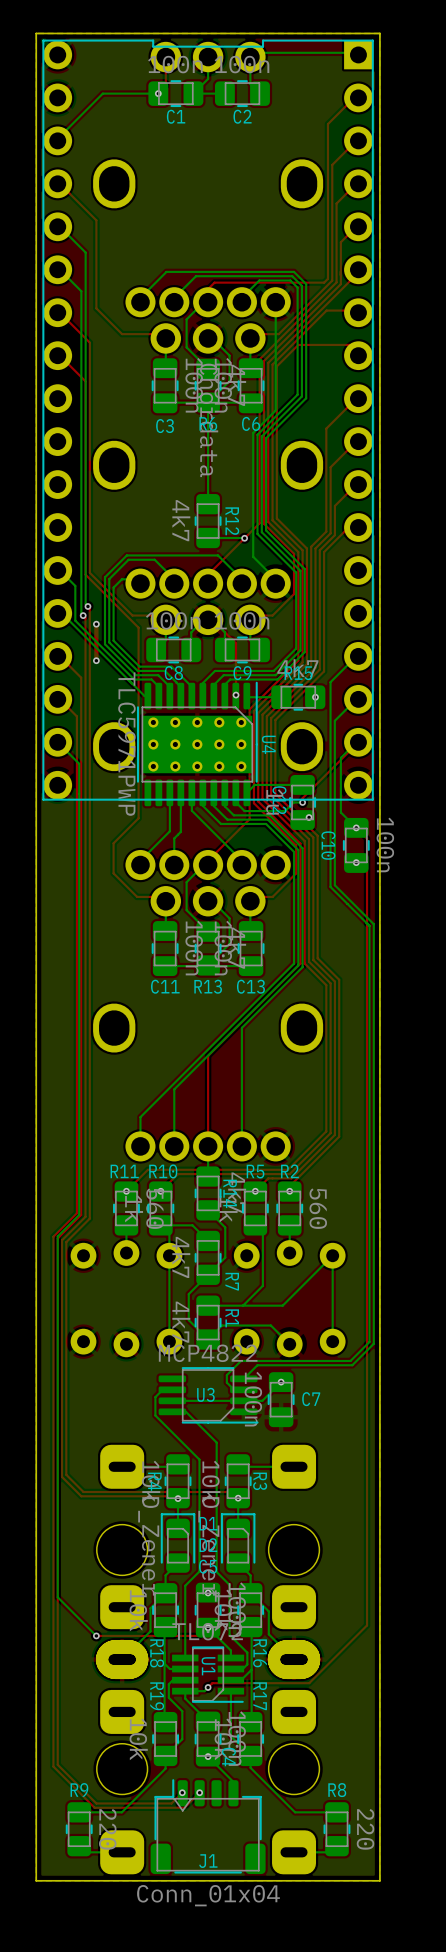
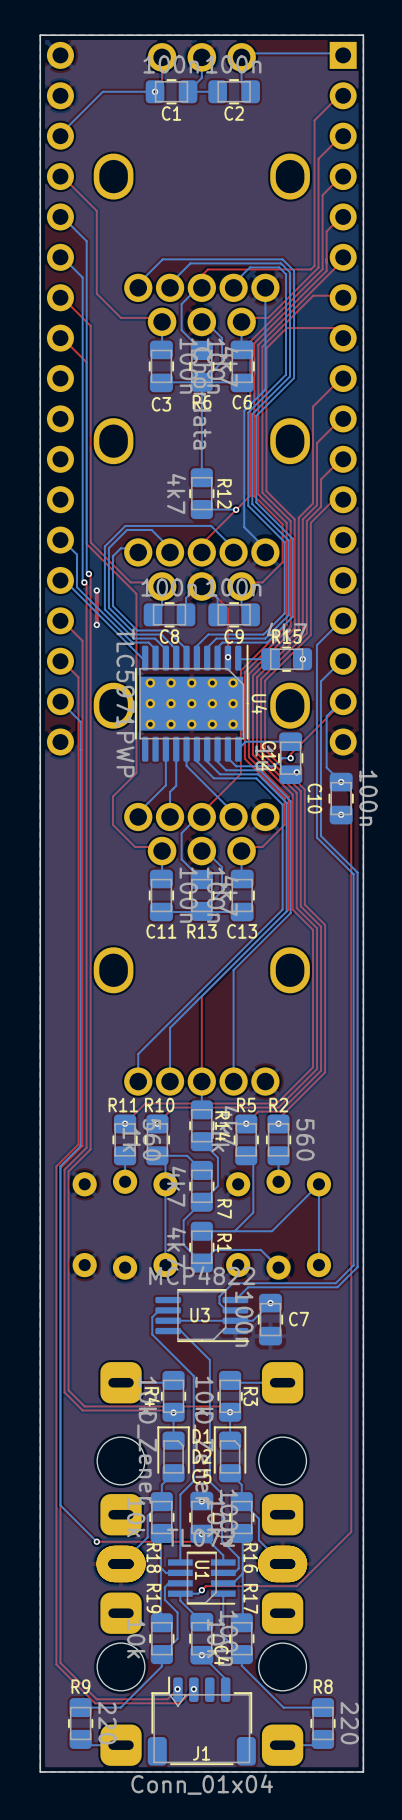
part footprint: [42, 39, 374, 801] -> [46, 41, 357, 756]

